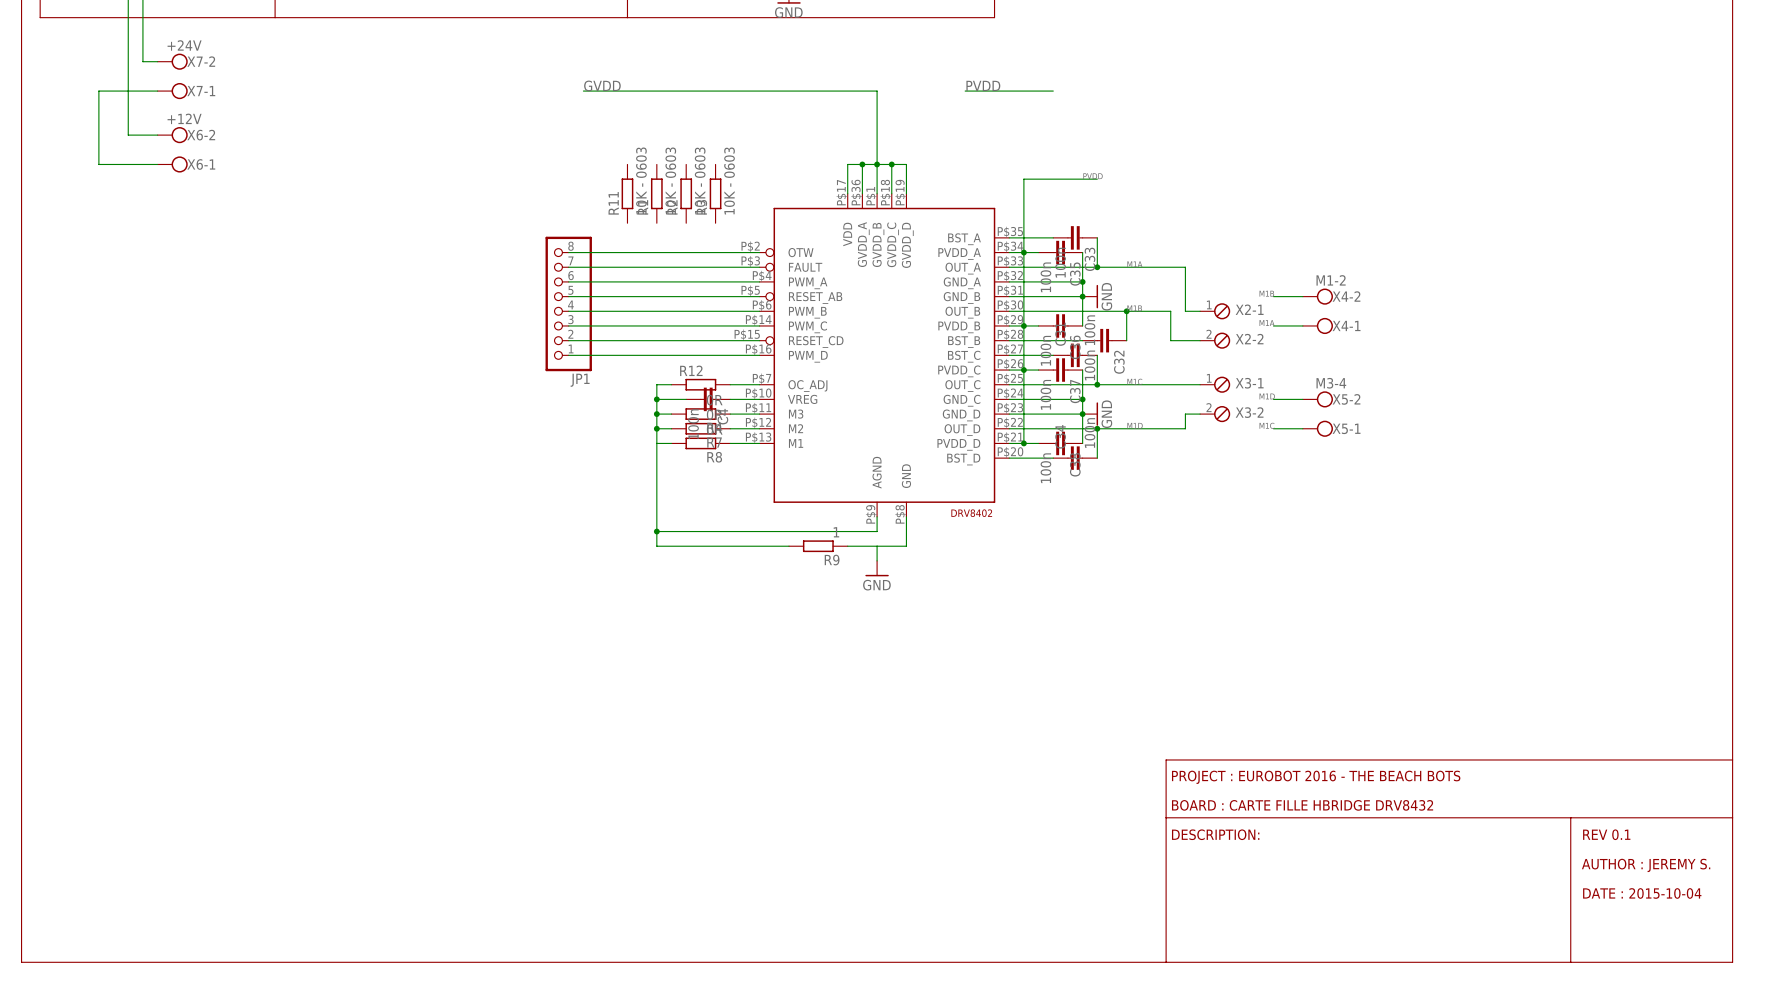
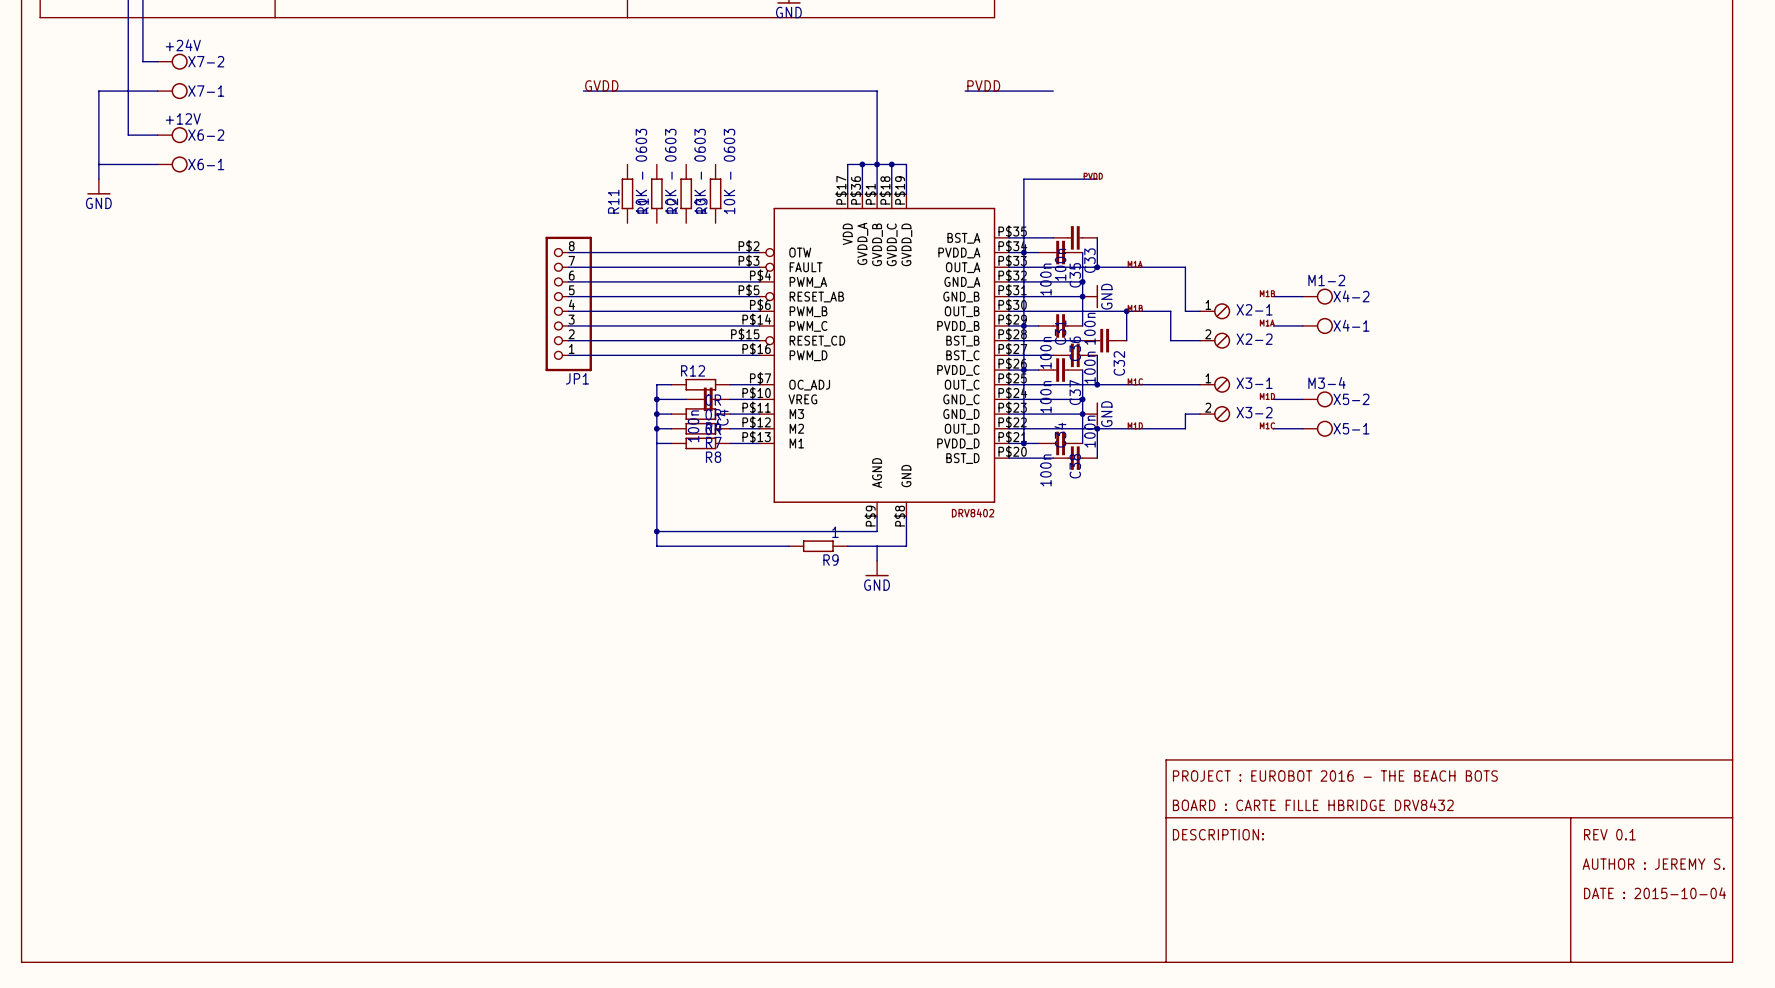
wire: none -> (98, 164) (98, 179)
power symbol: none -> GND (98, 186)

